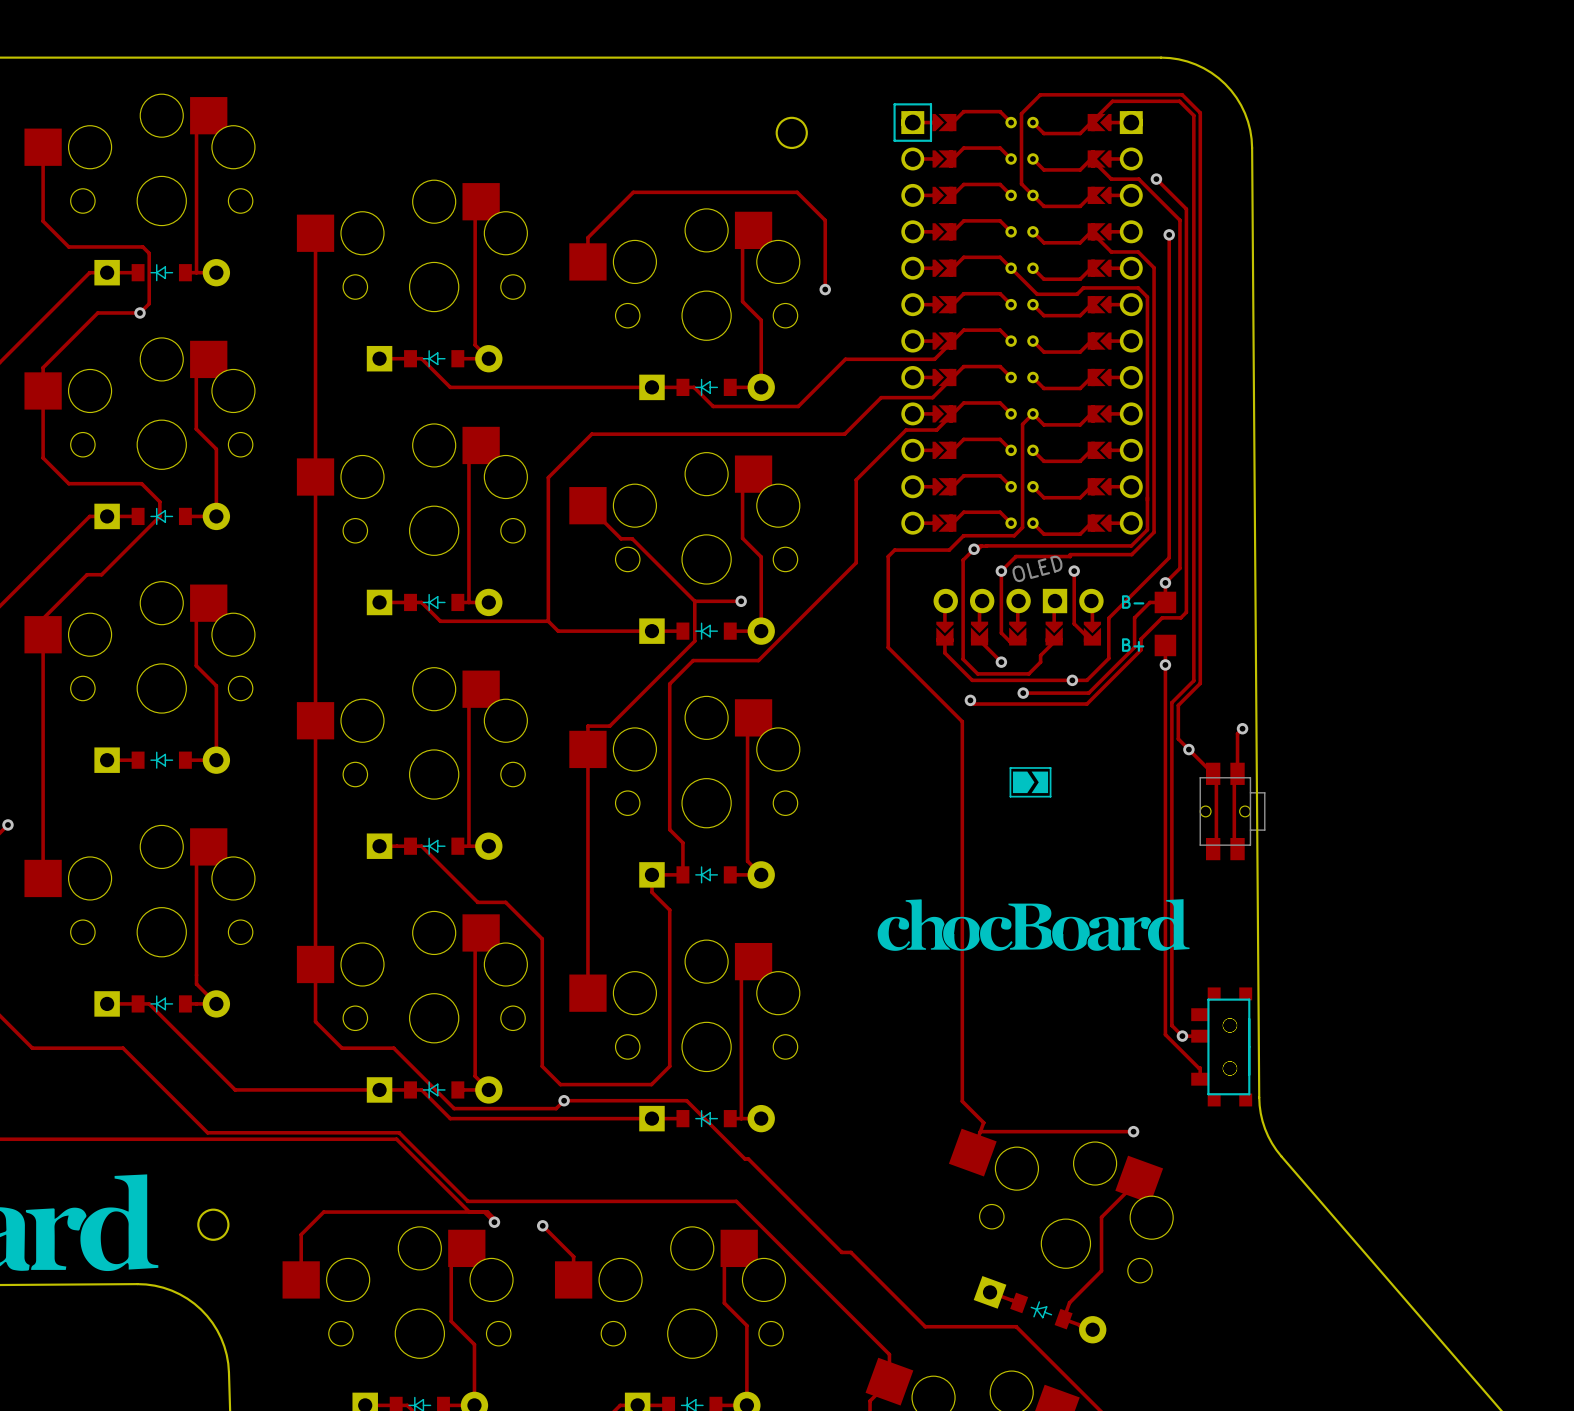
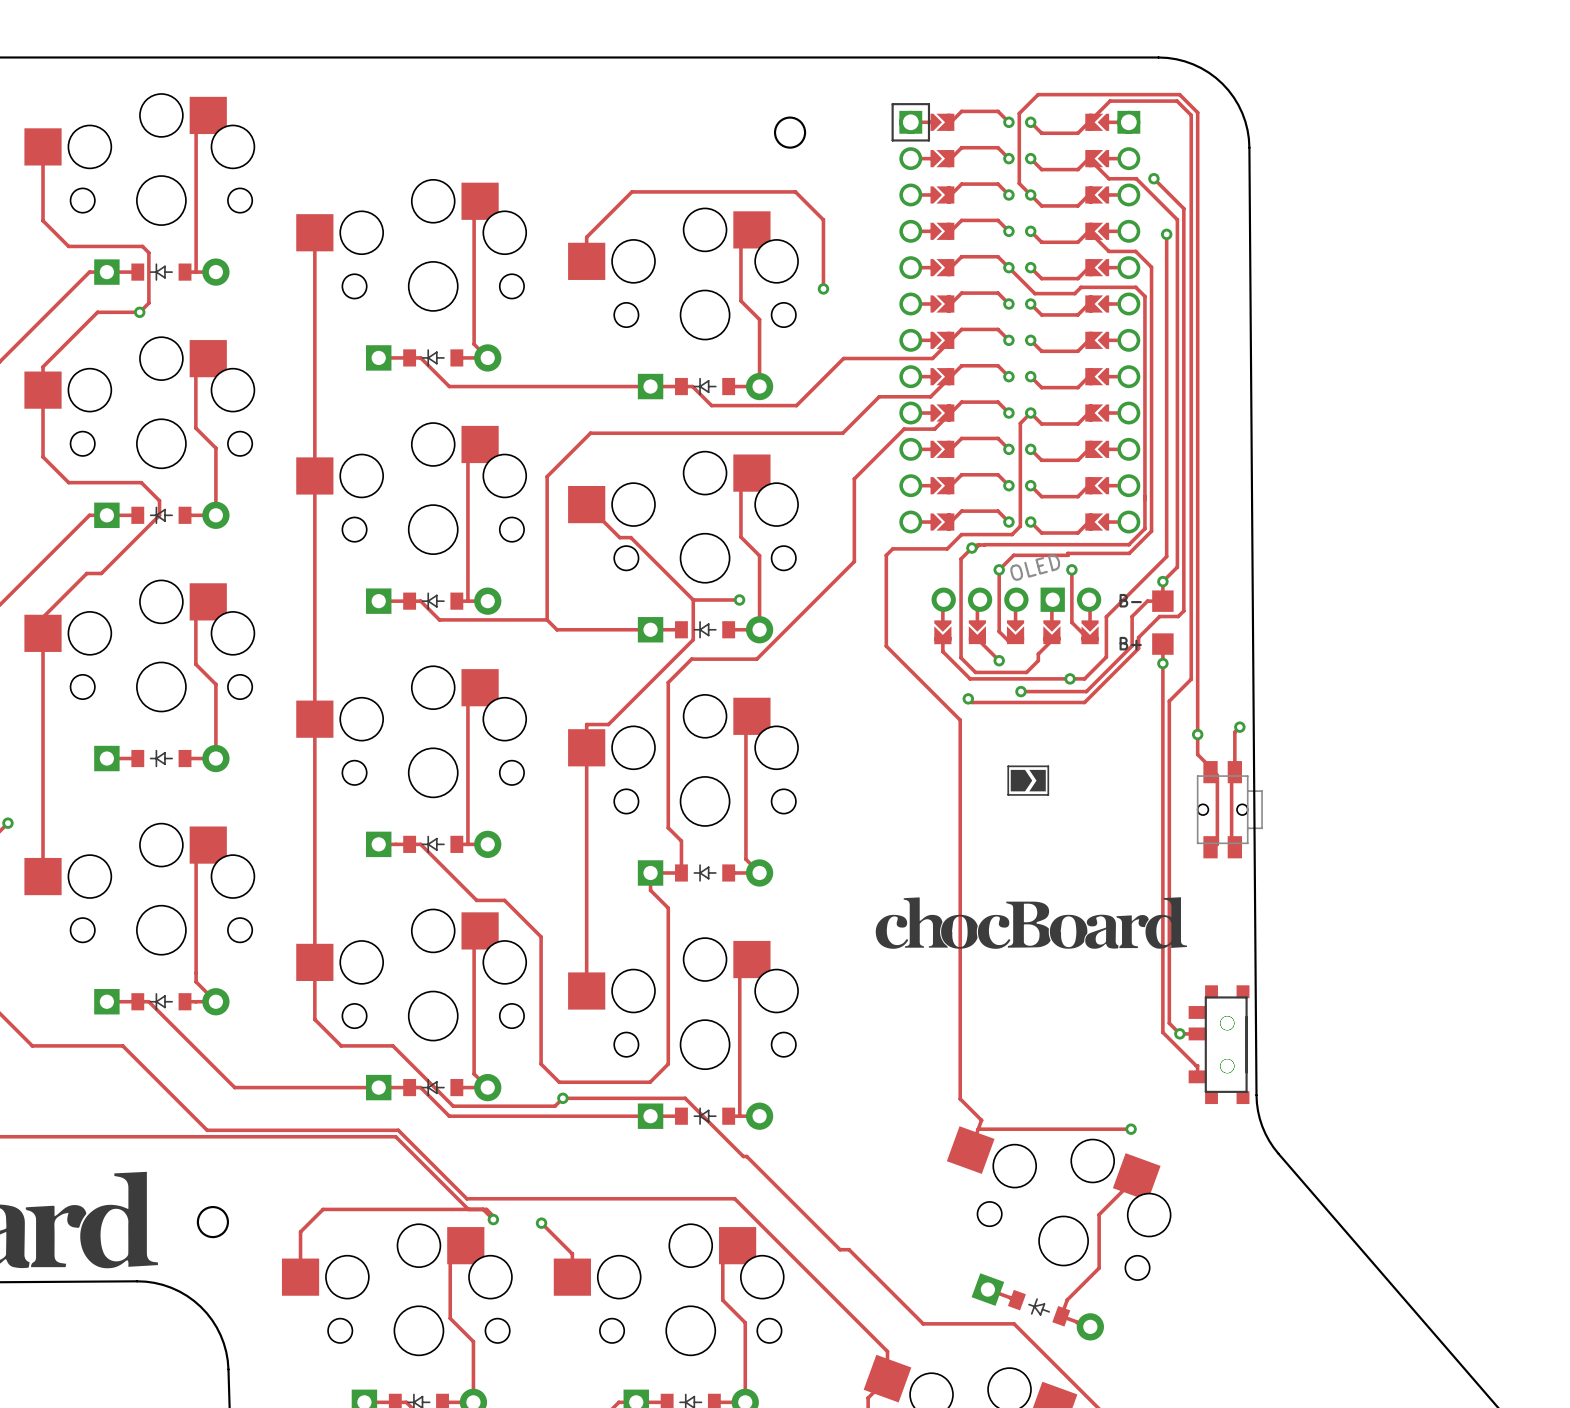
track: (1200, 683) (1178, 705) (1178, 738) (1216, 777) (1216, 841) (1213, 845) (1213, 849) (1216, 845) -> (1197, 681) (1197, 754) (1217, 775) (1217, 844) (1214, 847)
via position: (1188, 749) -> (1197, 734)

